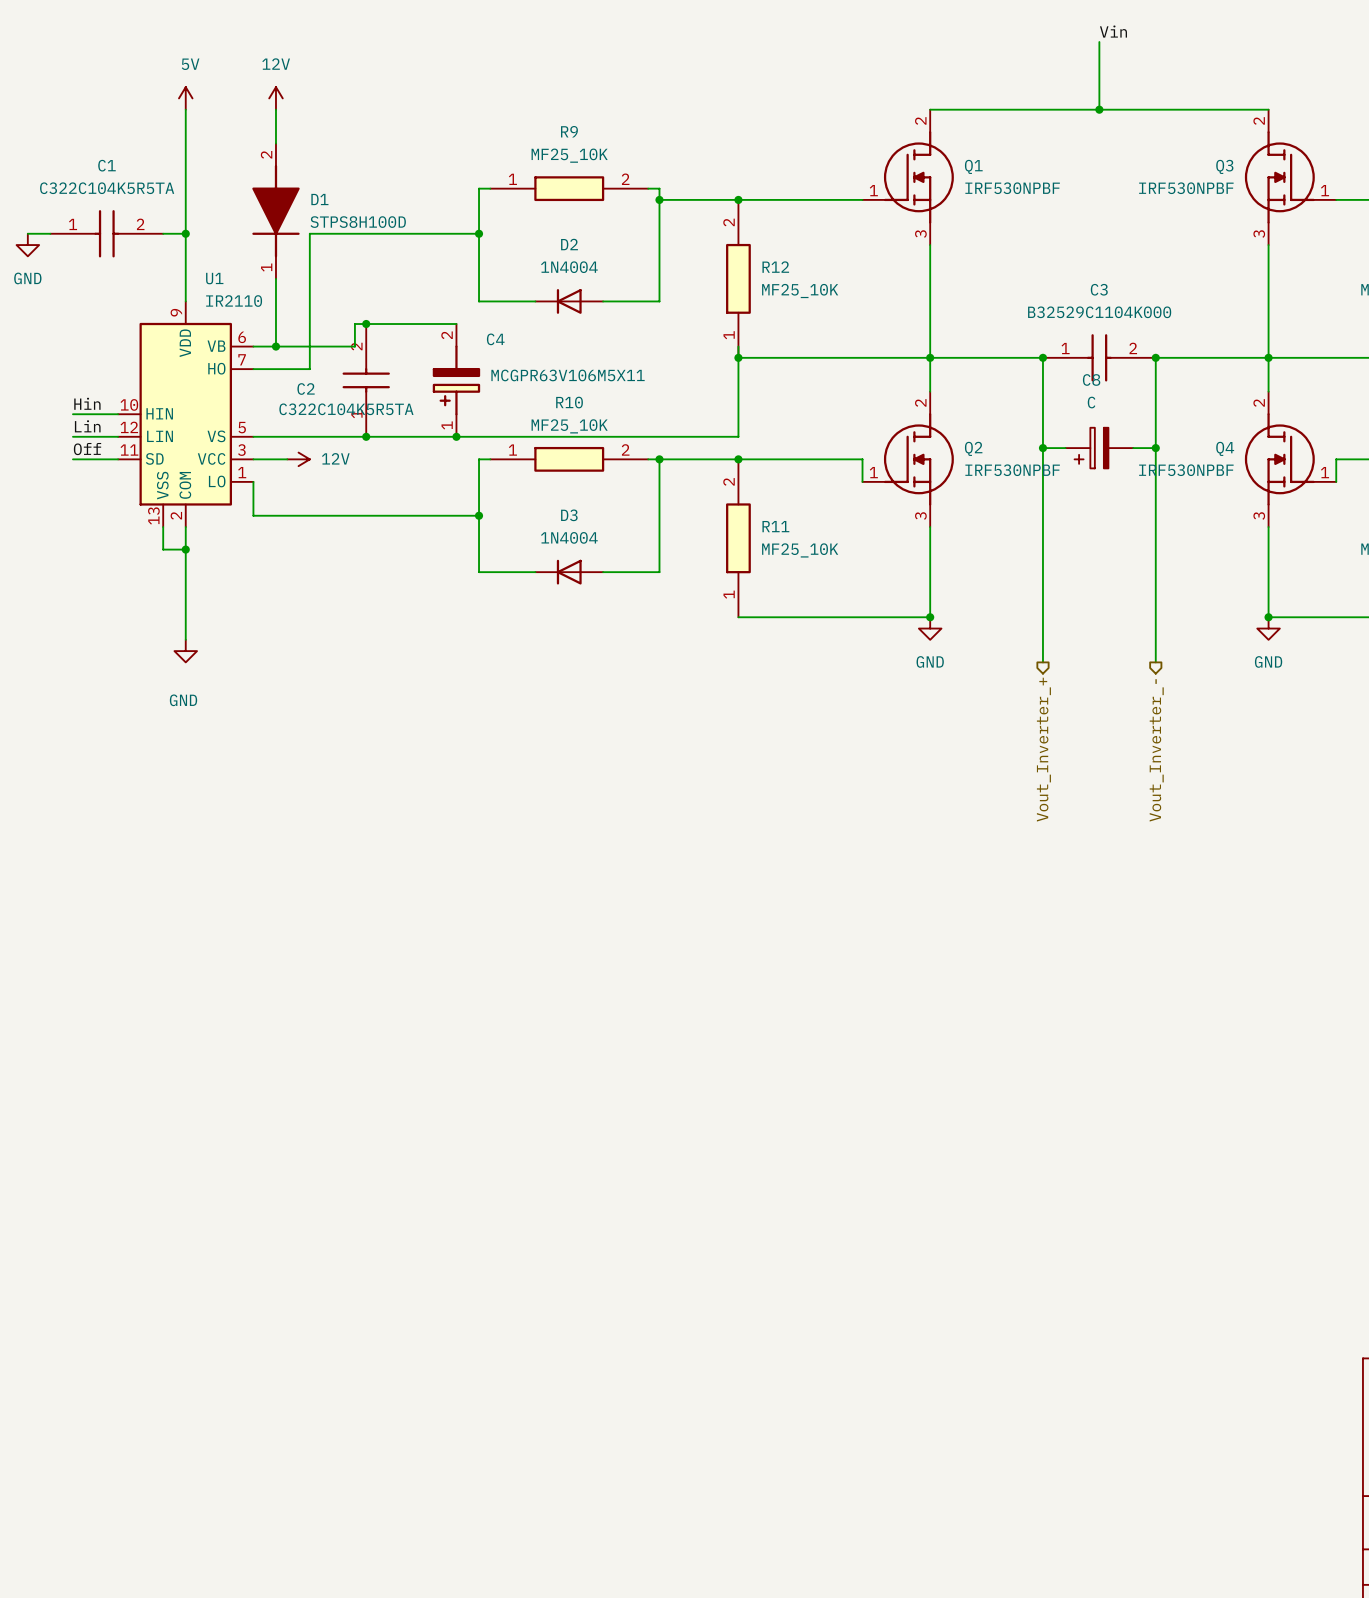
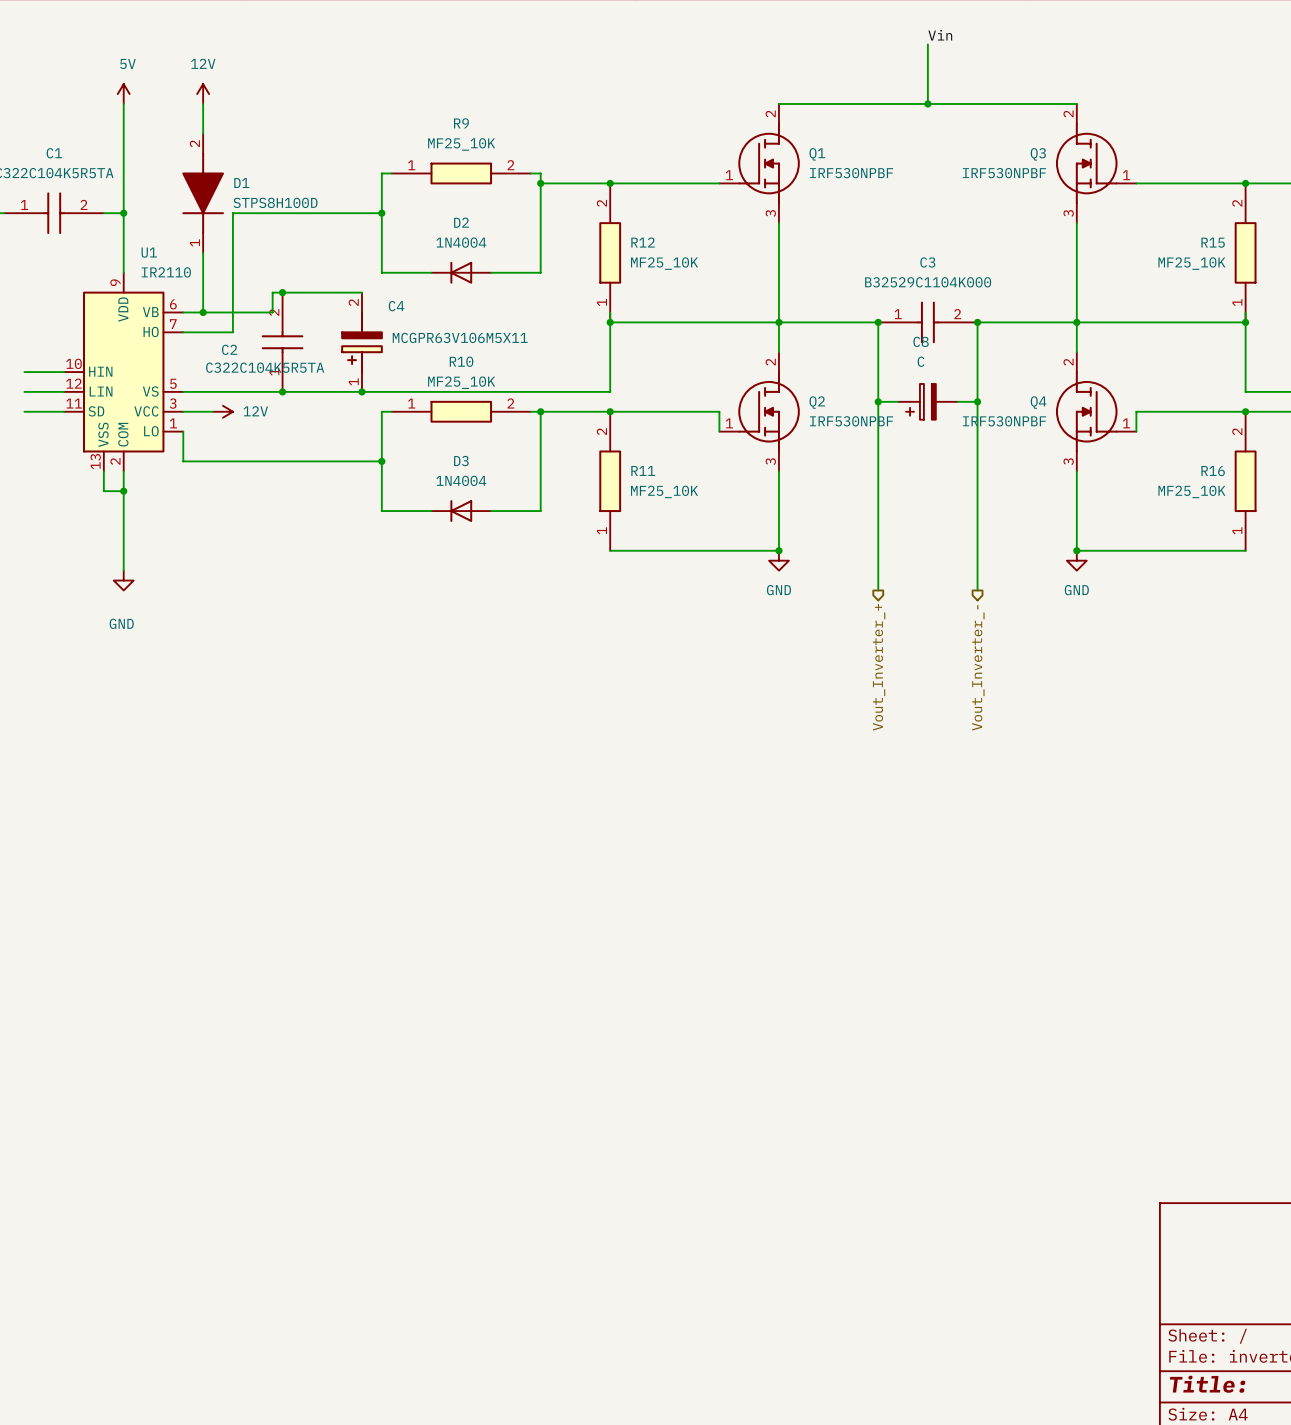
label: Hin (87, 403) -> none
label: Lin (87, 426) -> none
label: Off (87, 449) -> none

